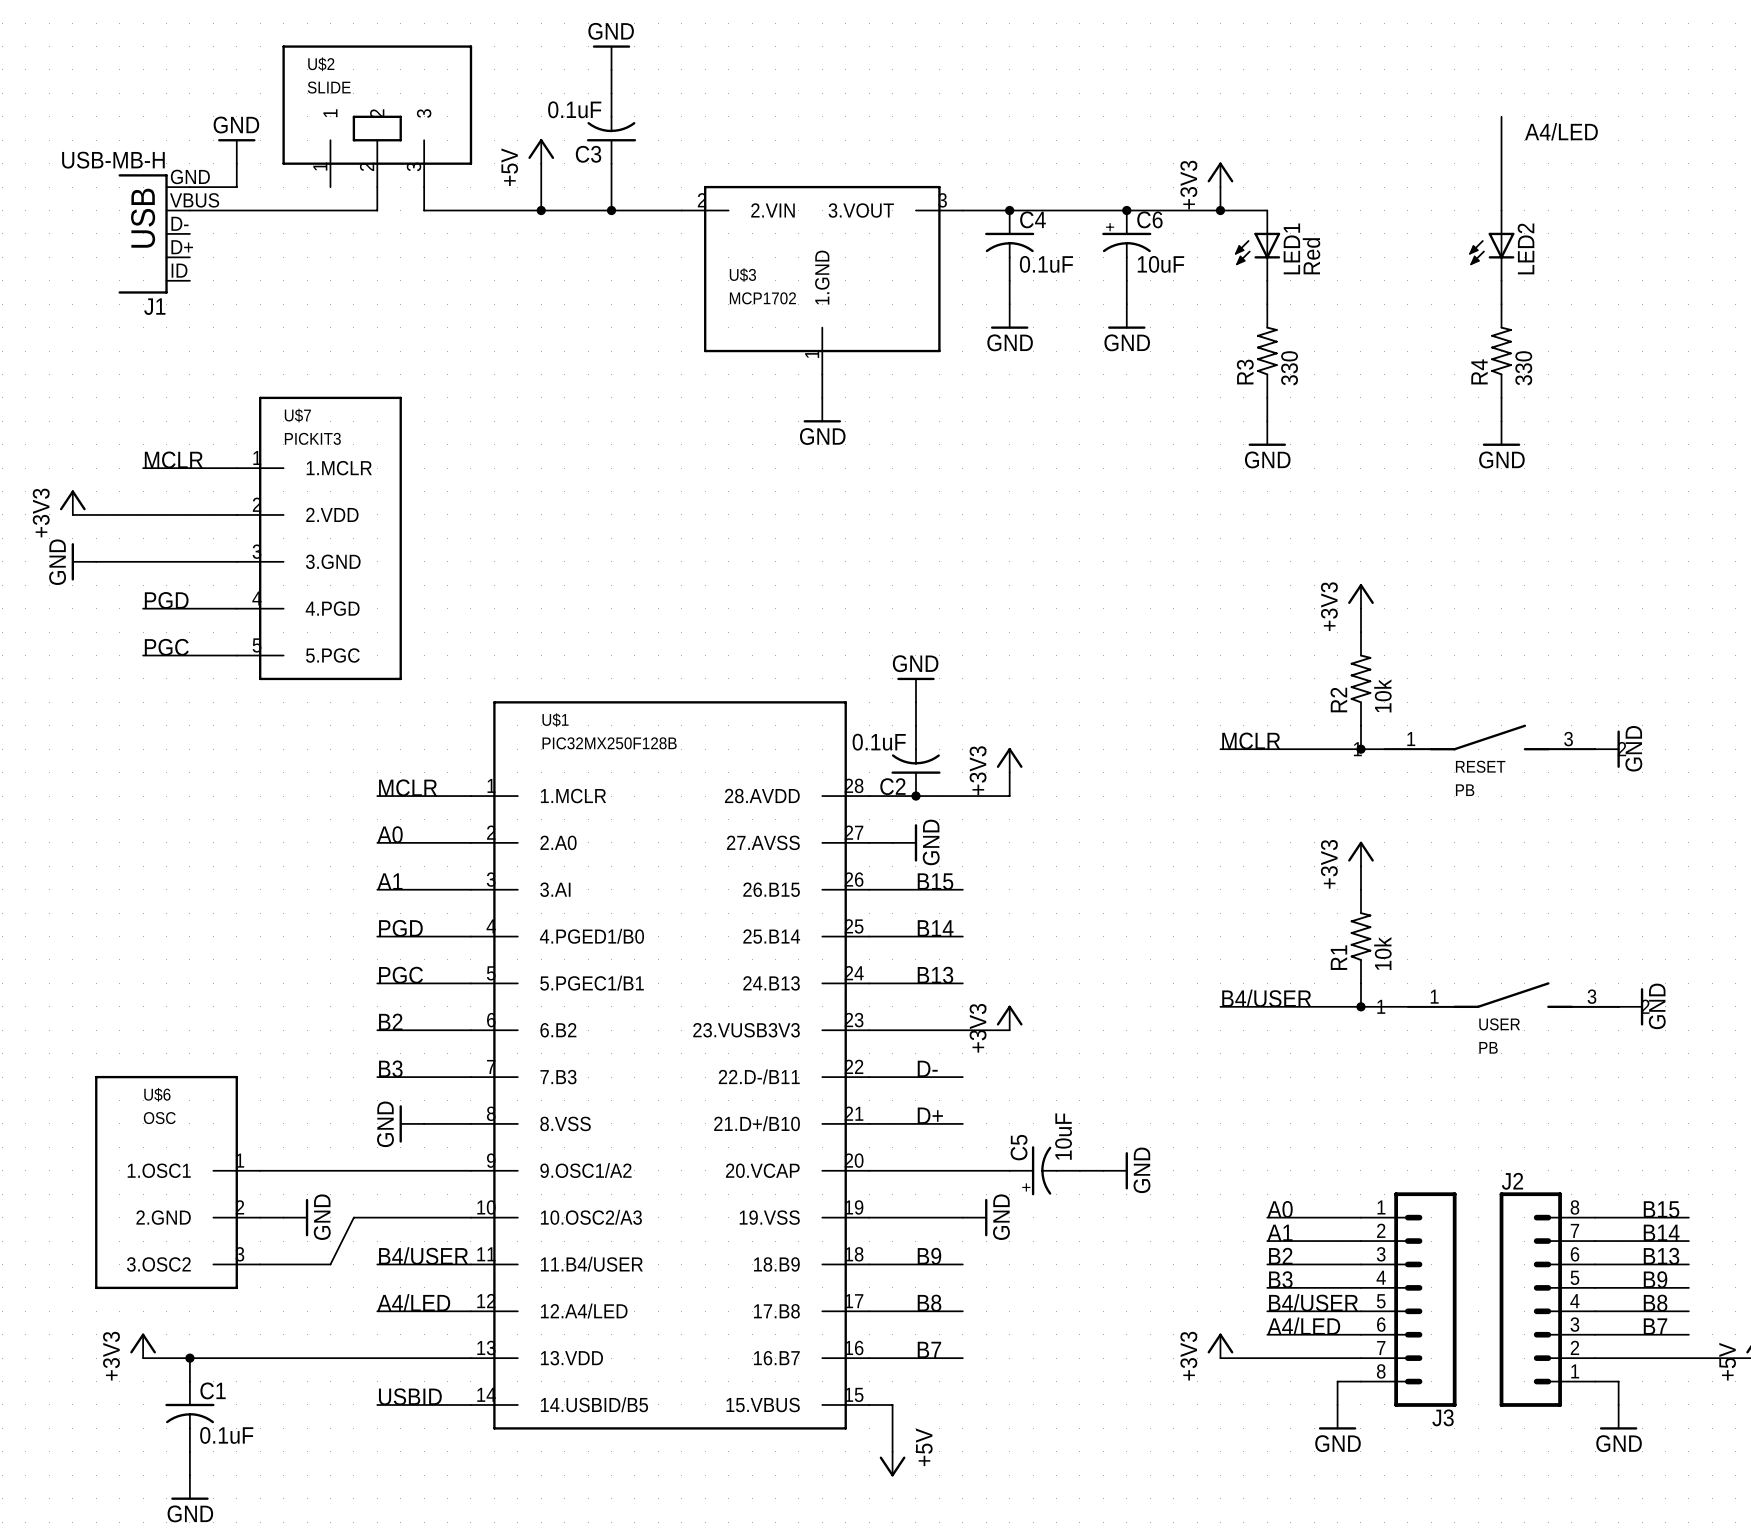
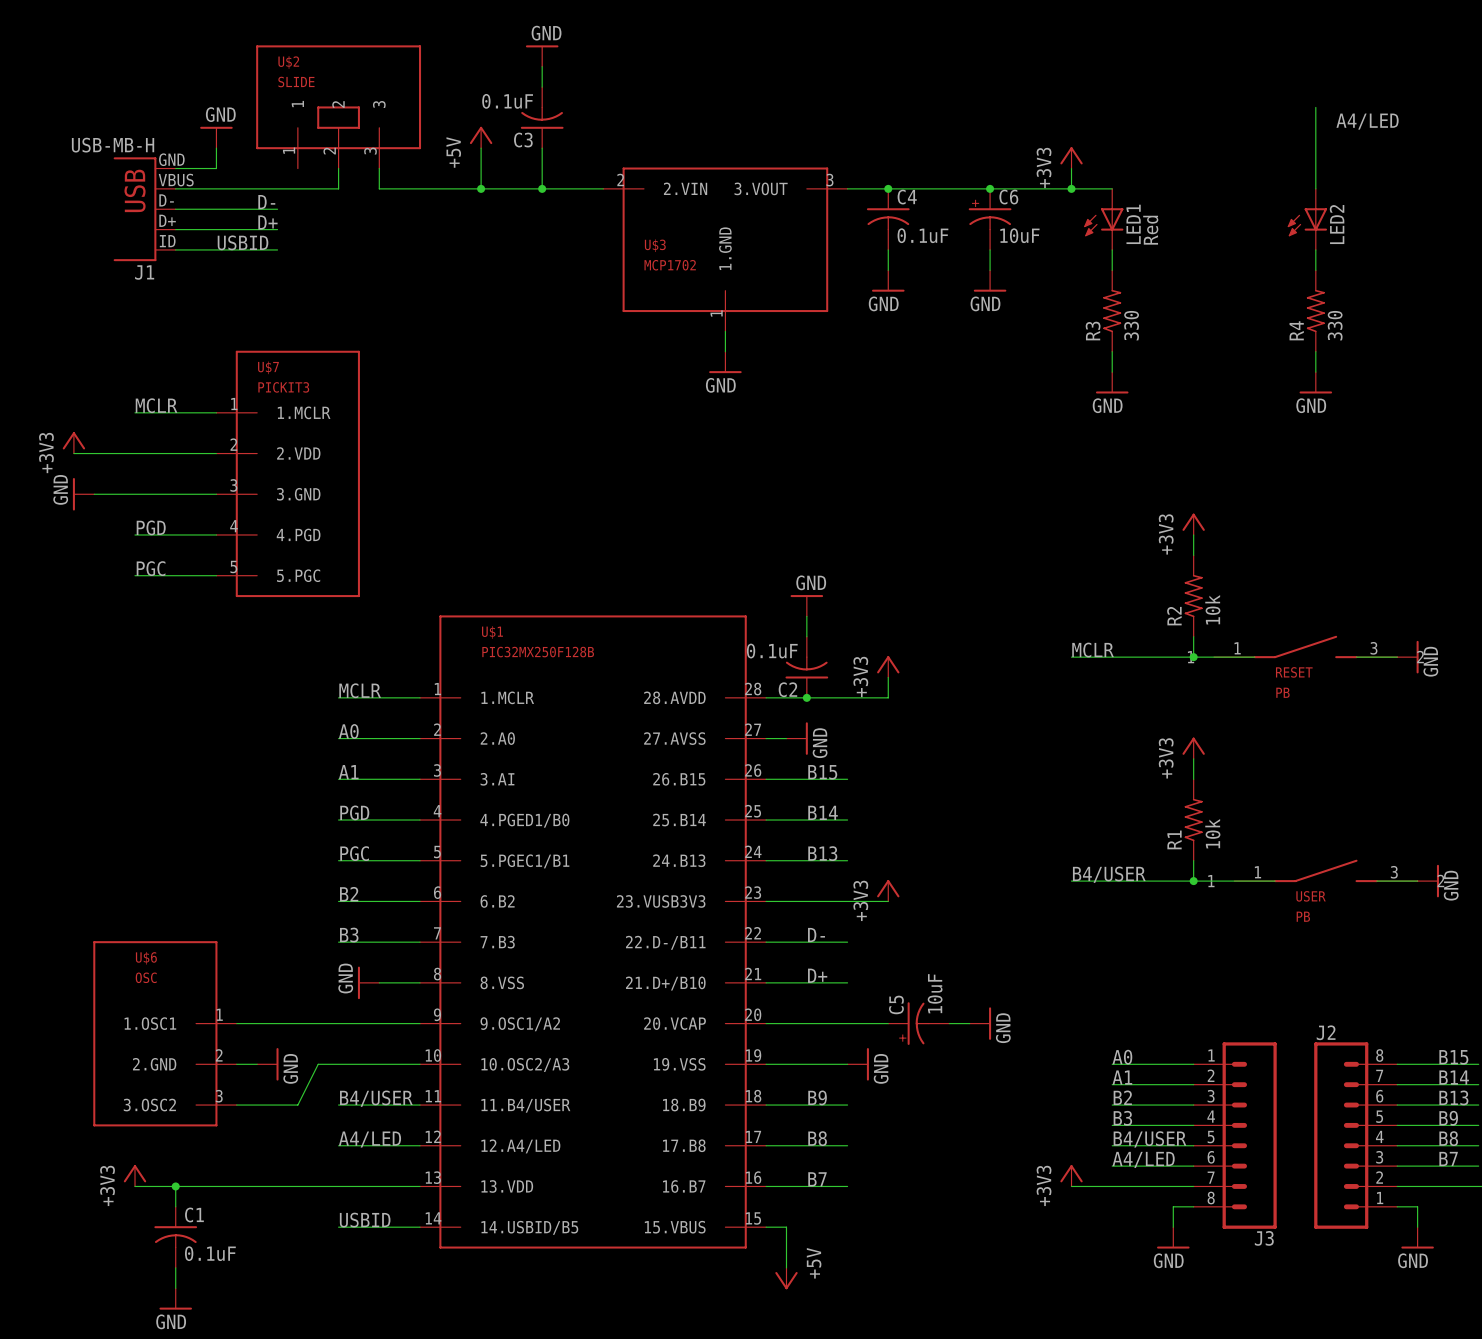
label: none -> D- (266, 202)
wire: none -> (175, 209) (277, 209)
label: none -> D+ (267, 222)
wire: none -> (175, 229) (277, 229)
label: none -> USBID (243, 242)
wire: none -> (175, 249) (277, 249)

